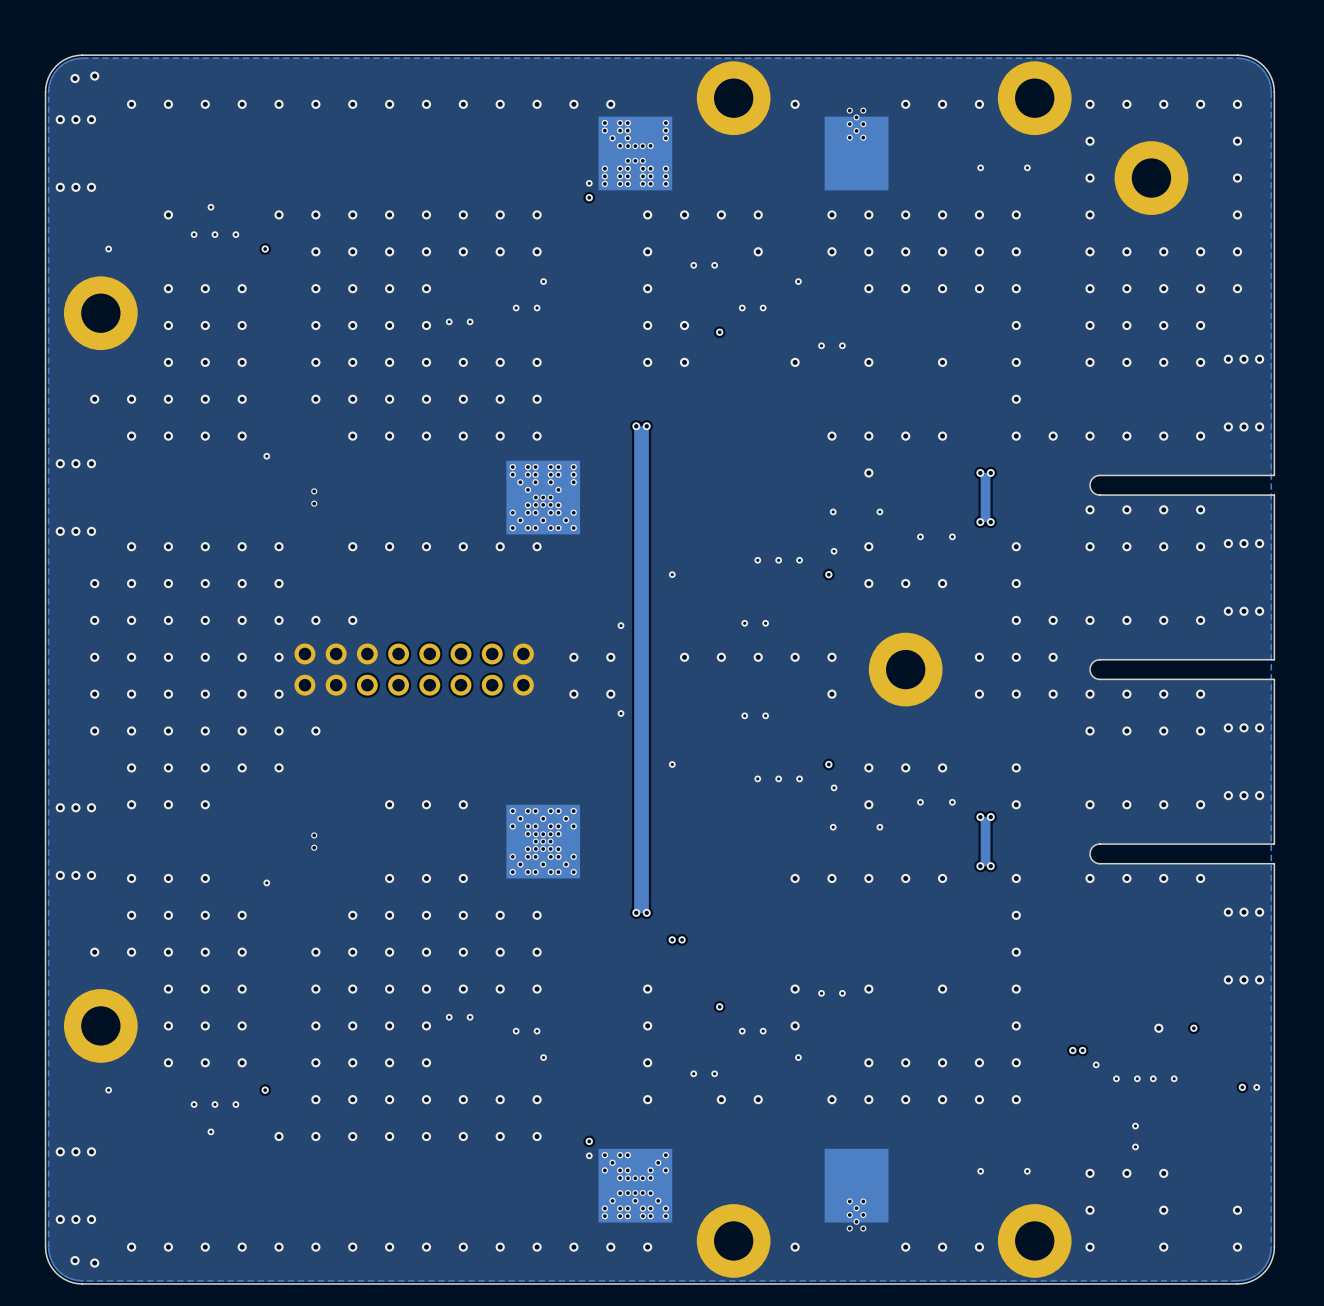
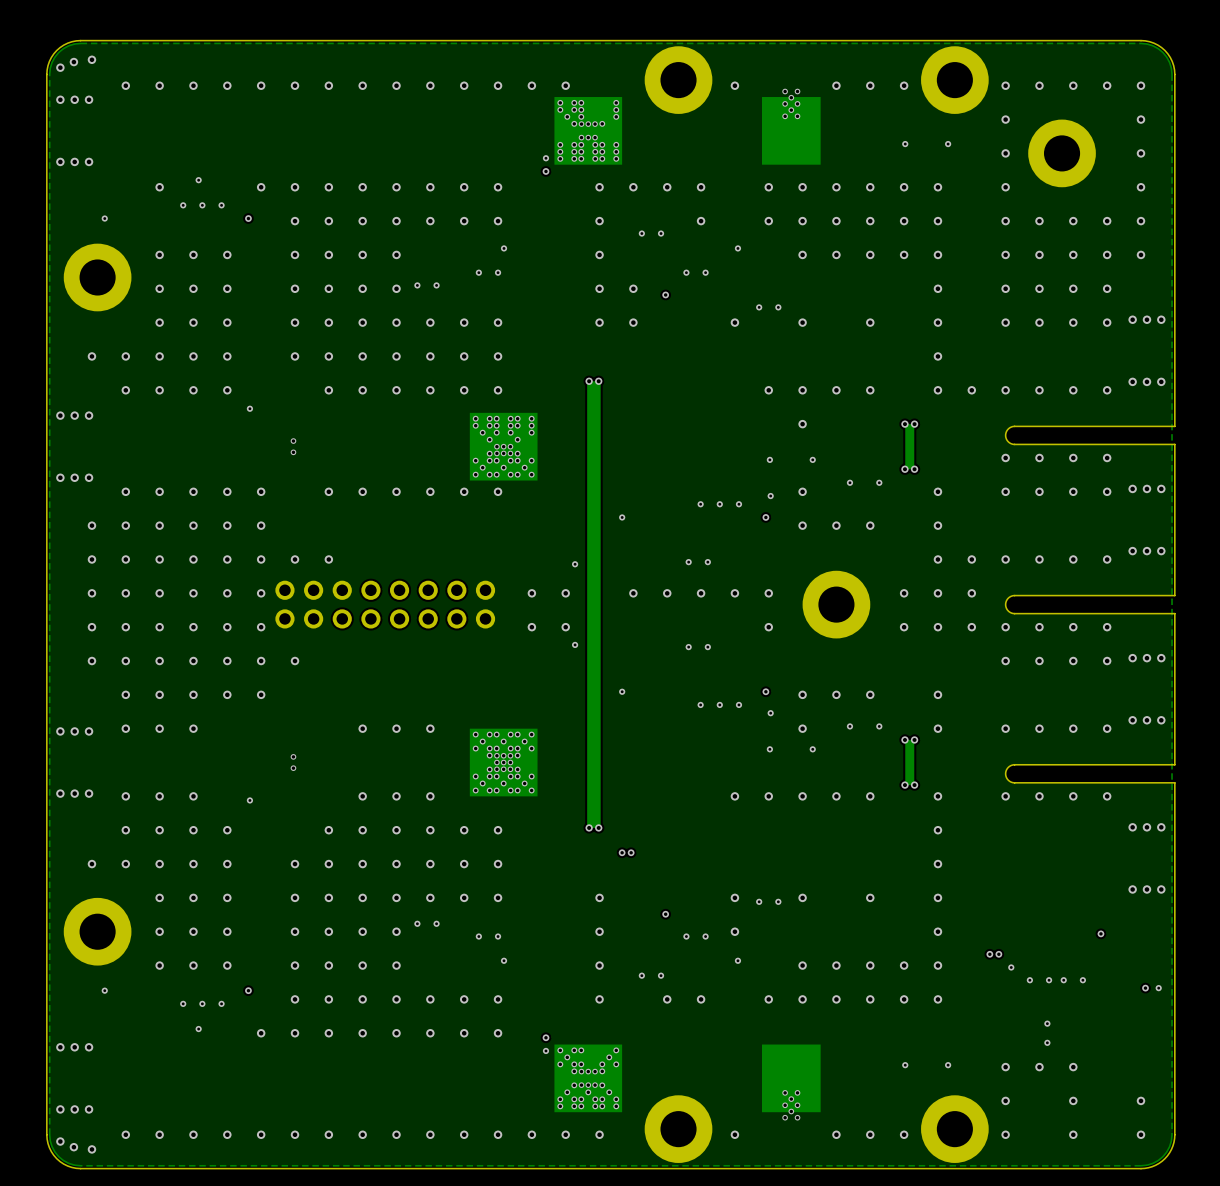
via: none -> (60, 67)
via: (1158, 1028) -> none
via: none -> (60, 1141)

